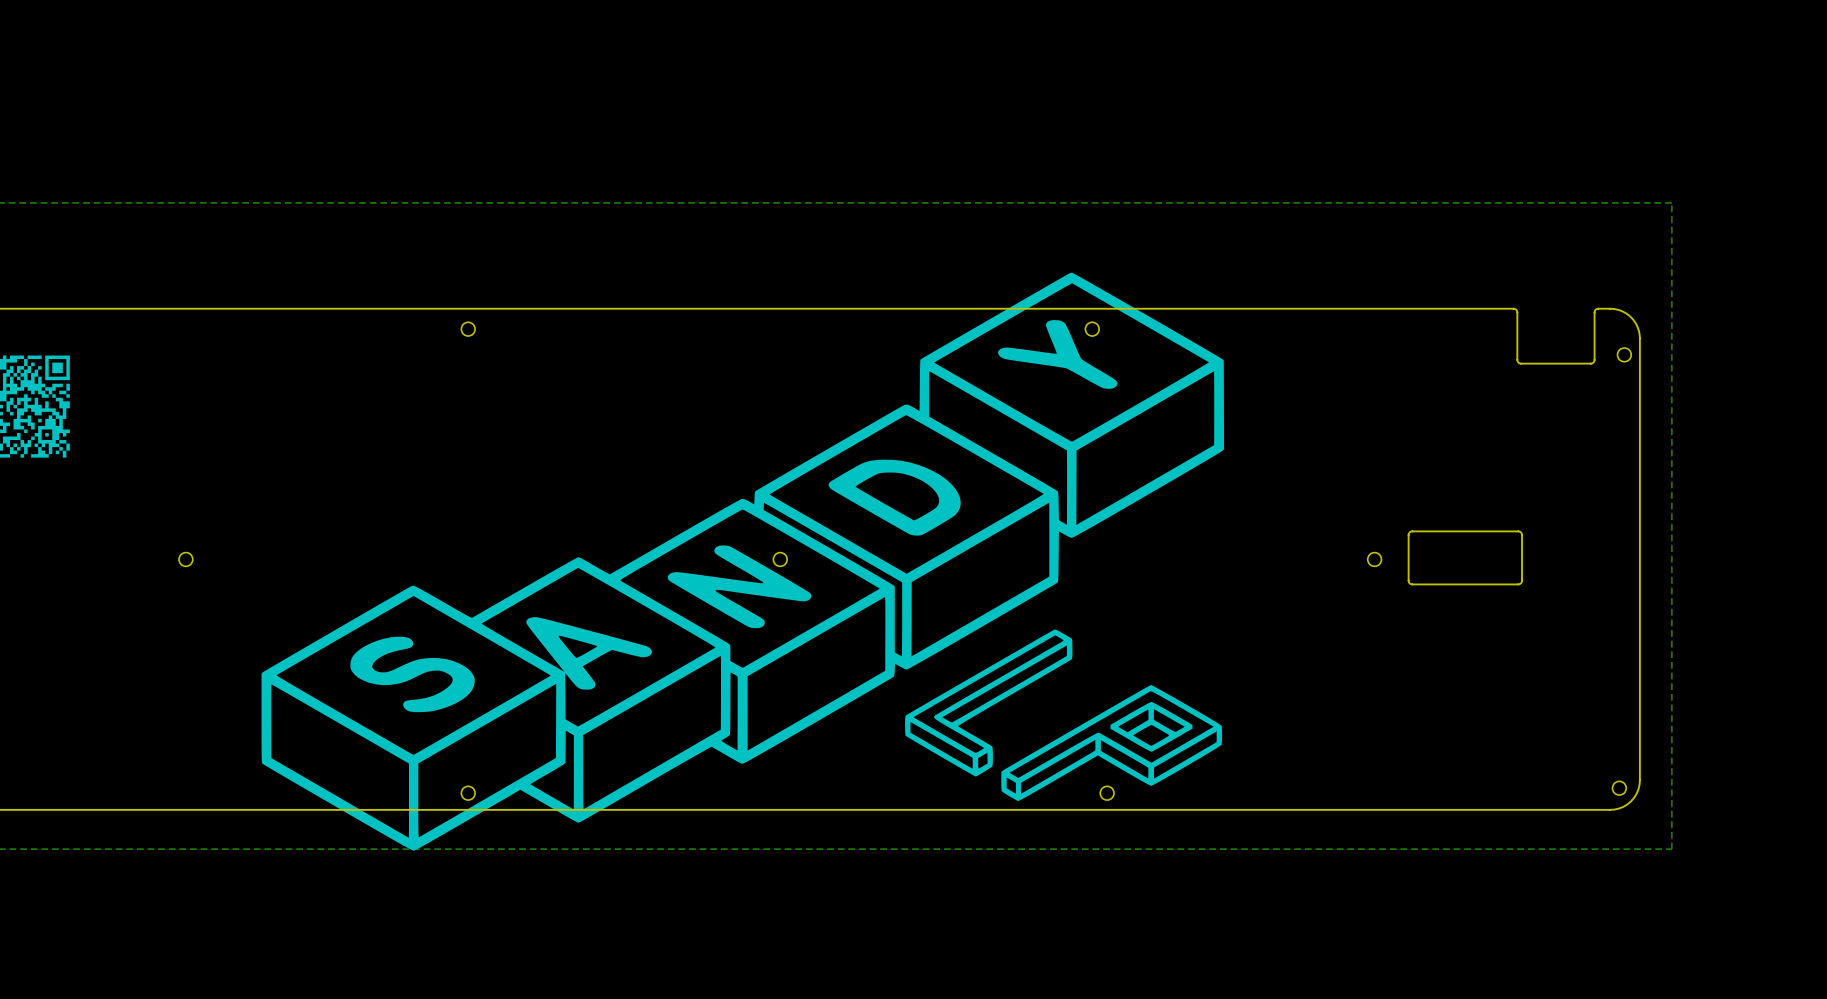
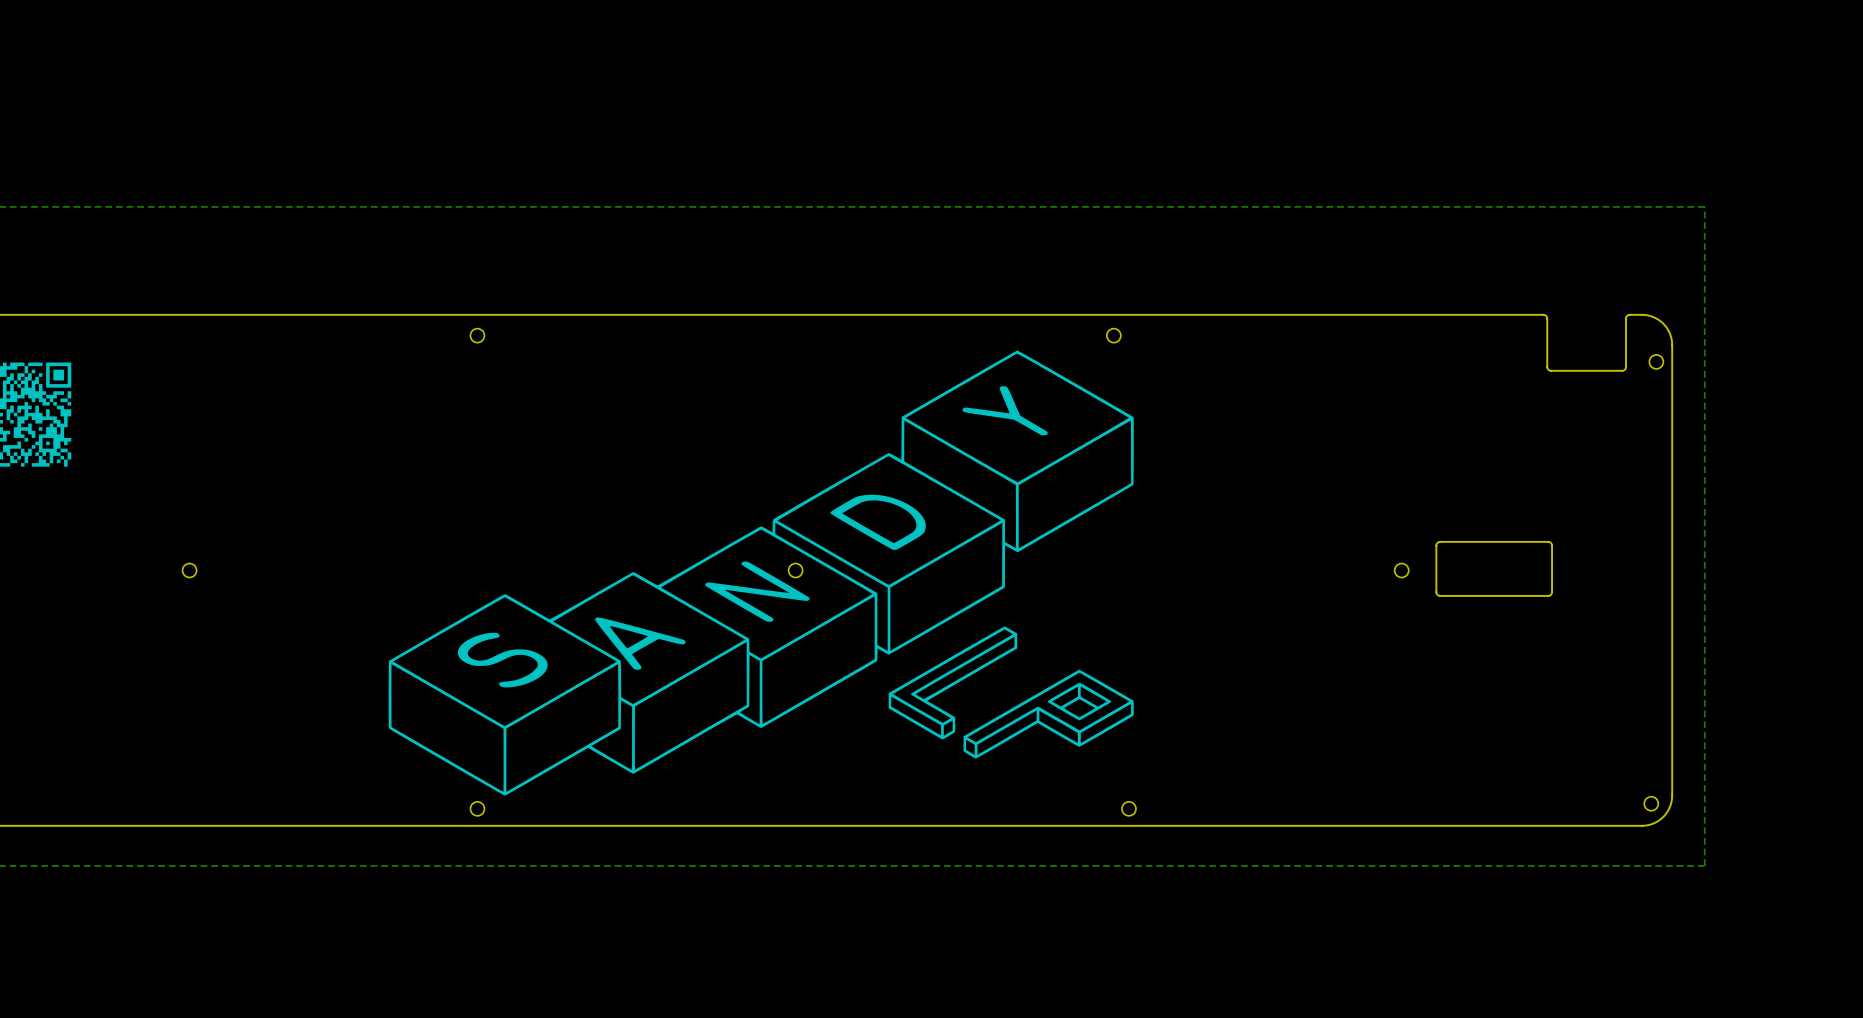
drawing shape: [261, 272, 1225, 851] -> [388, 350, 1134, 796]

